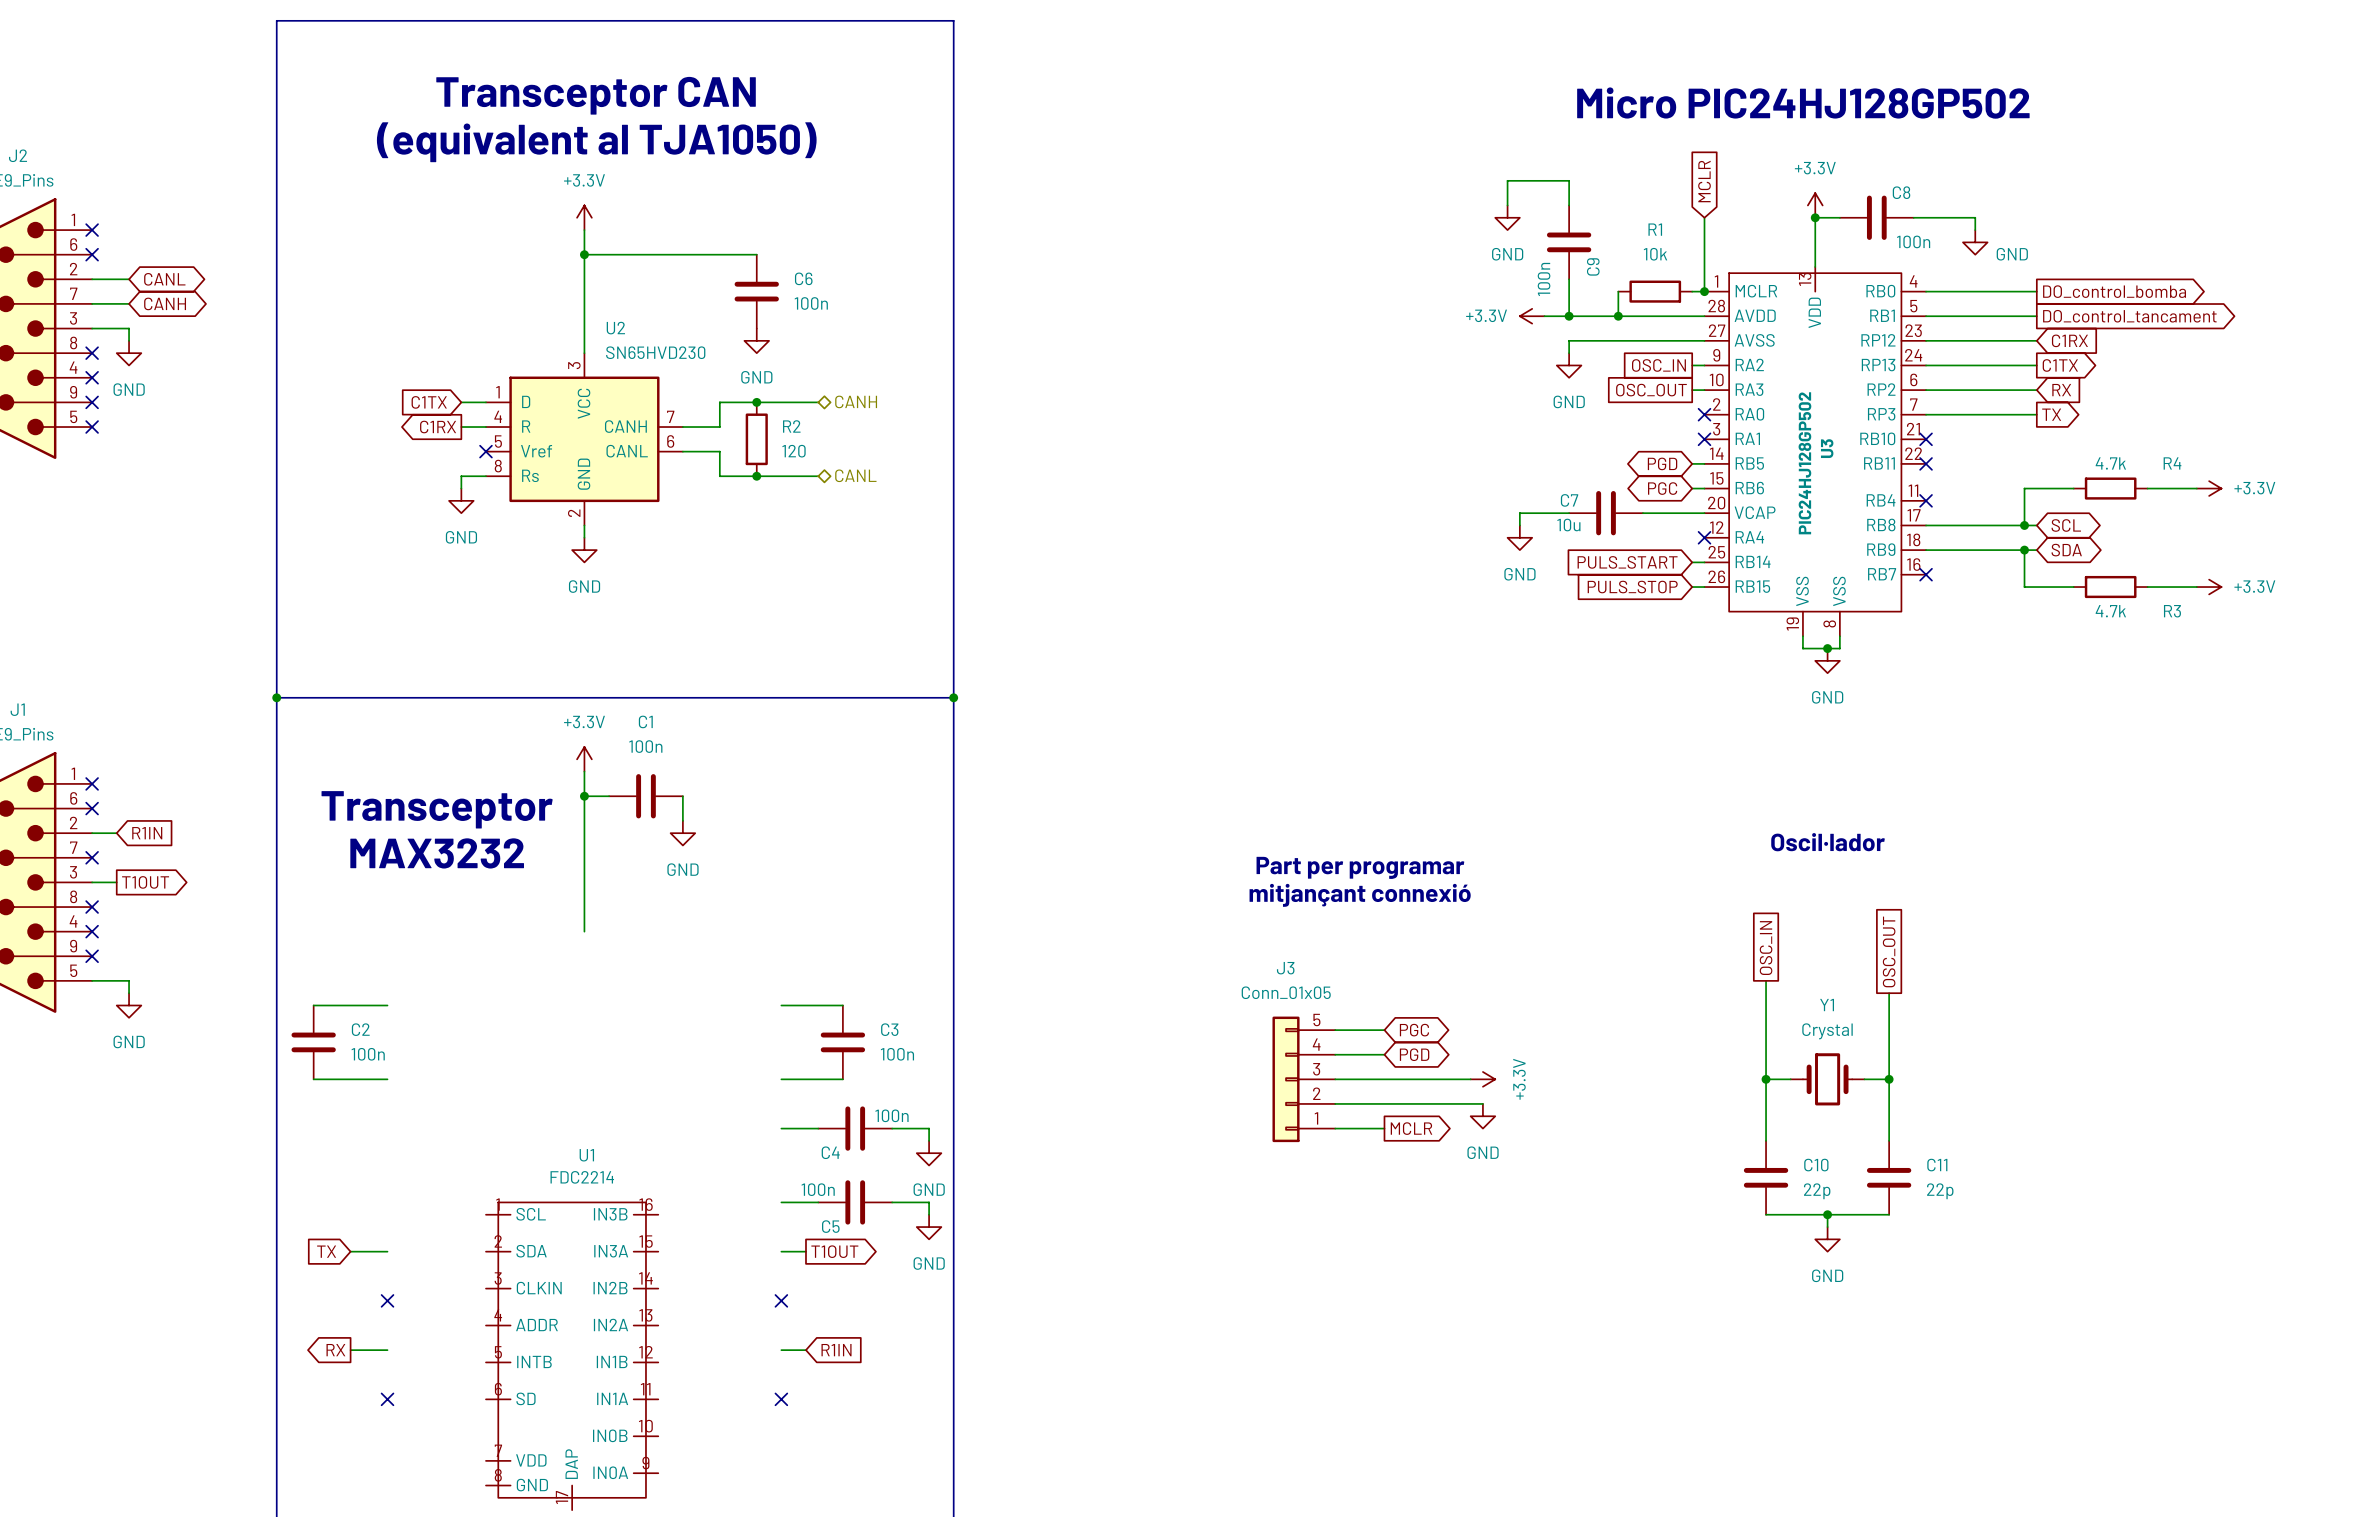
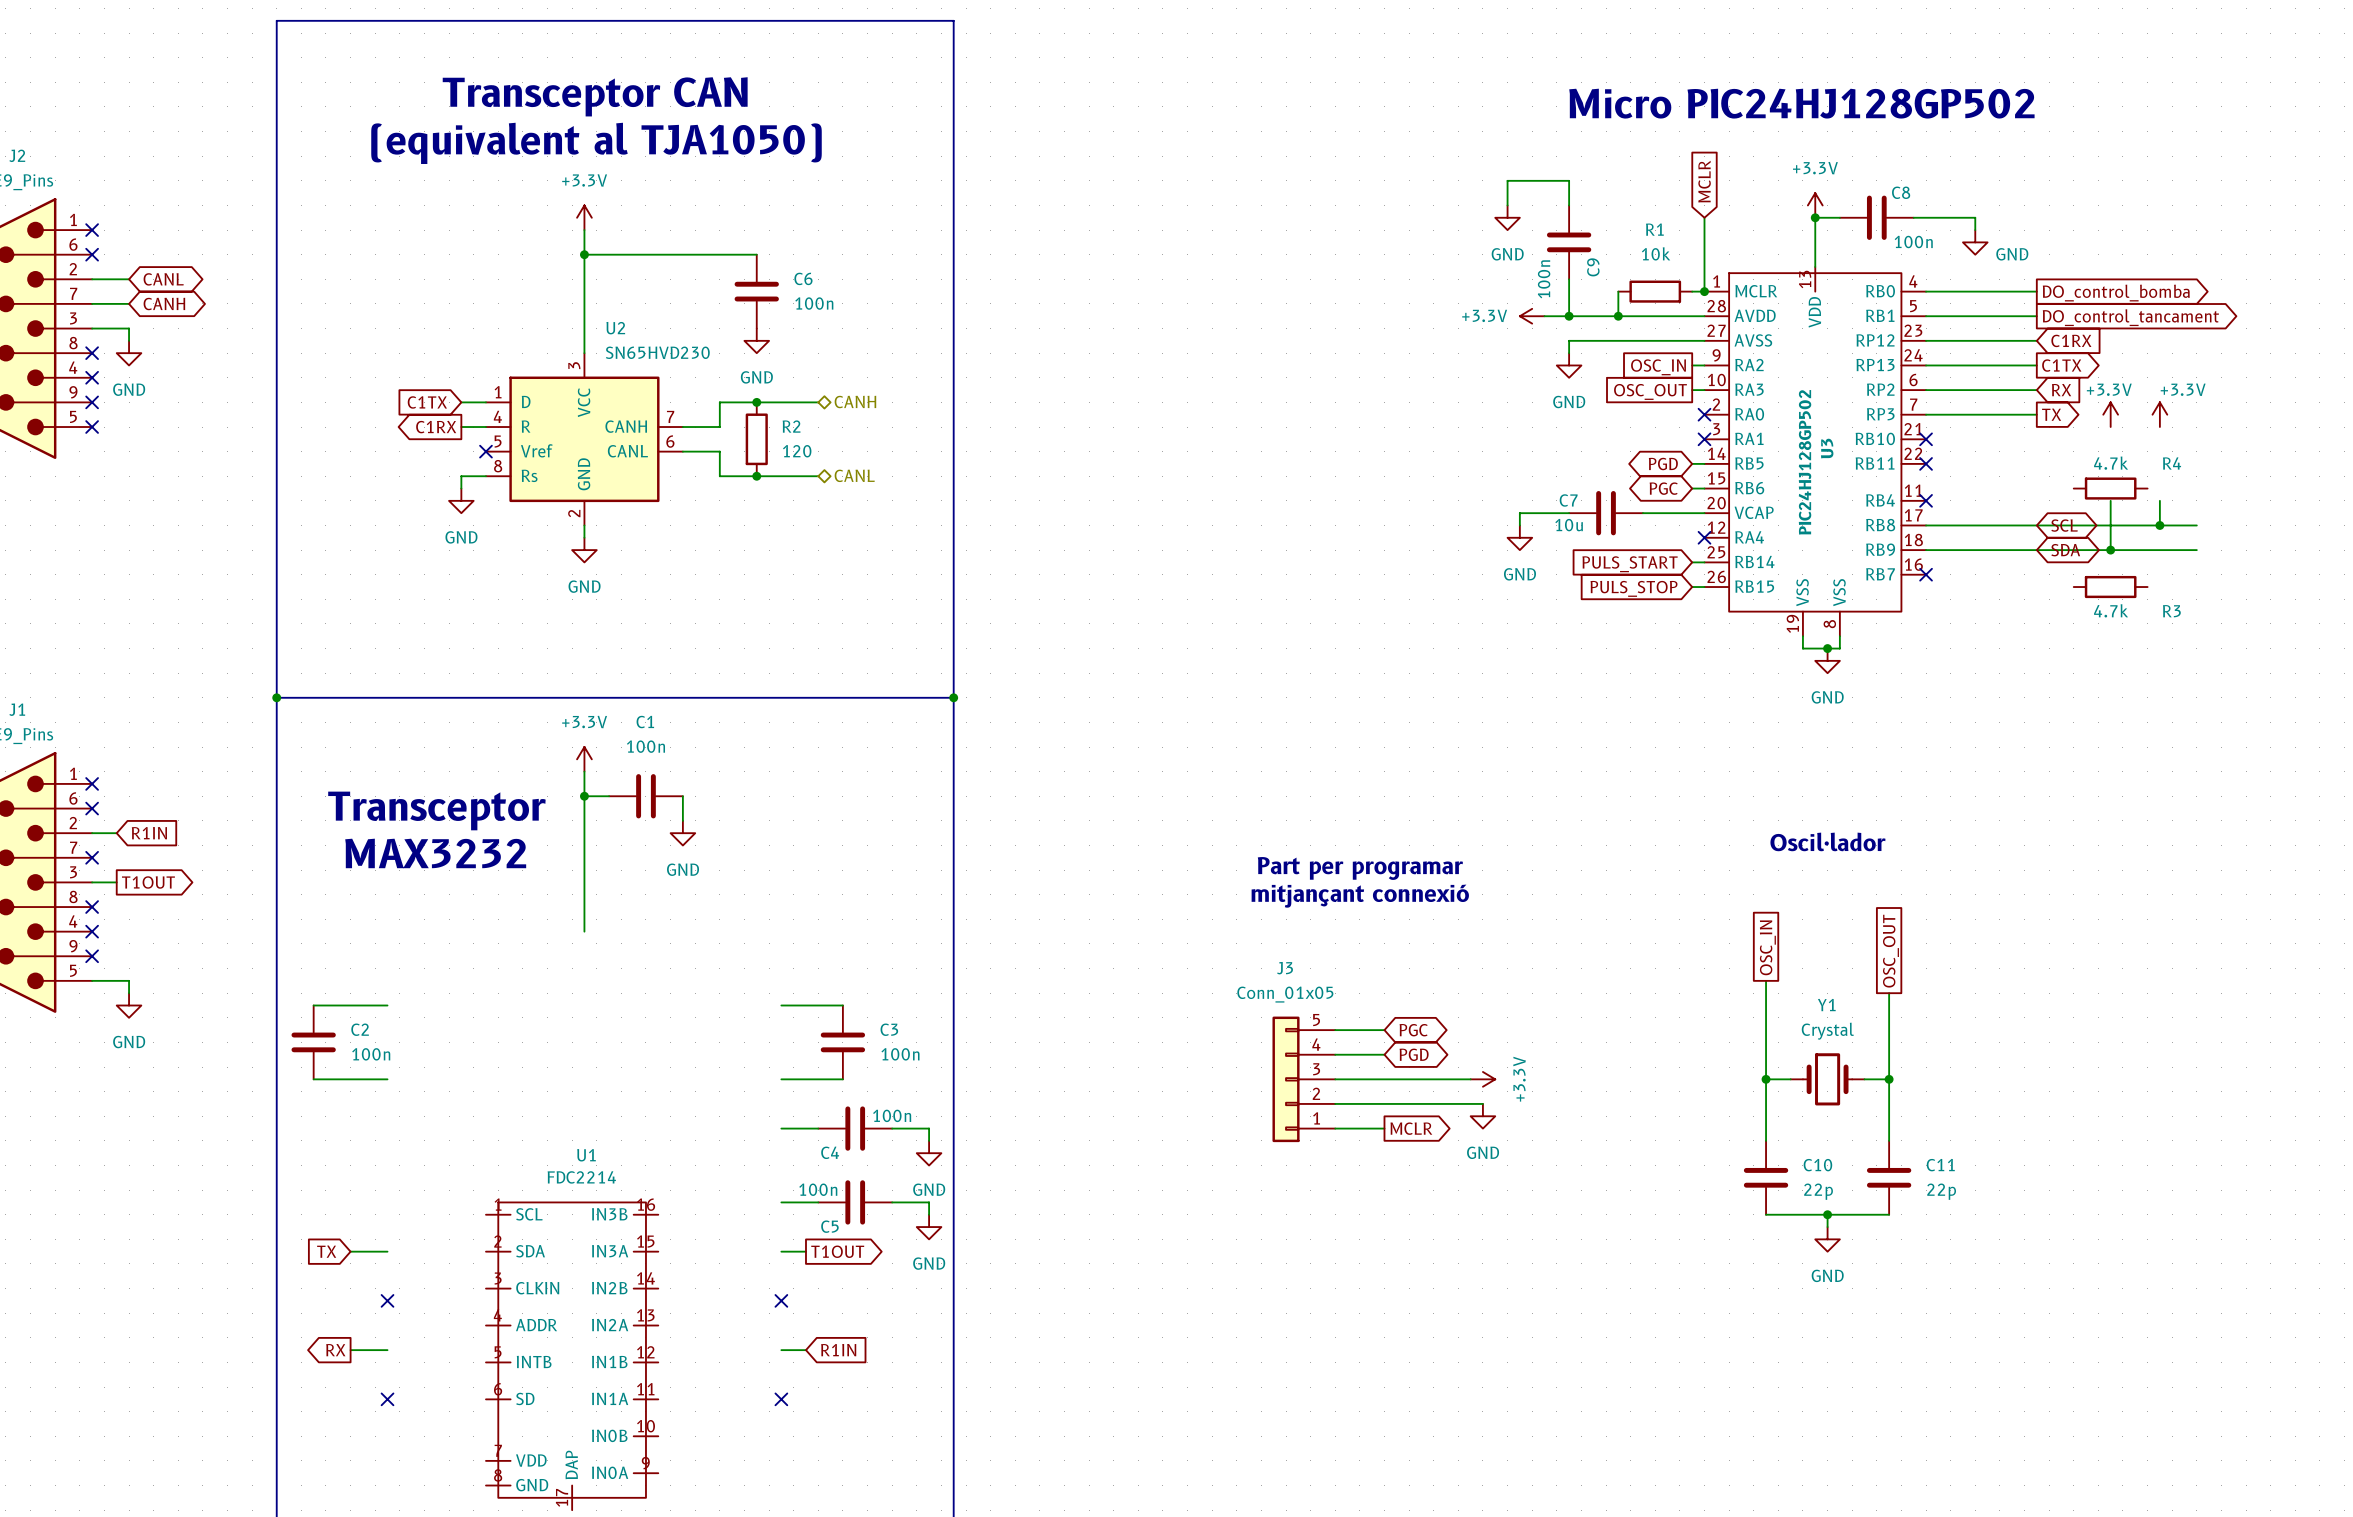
power symbol: none -> +3.3V (2110, 414)
power symbol: none -> +3.3V (2159, 414)
wire: (2073, 488) (2024, 488) (2024, 525) -> none
wire: (2147, 488) (2196, 488) -> none
power symbol: +3.3V (2209, 488) -> none
wire: none -> (2110, 500) (2110, 550)
wire: none -> (2159, 500) (2159, 525)
junction: (2024, 525) -> none
wire: none -> (2036, 525) (2196, 525)
junction: none -> (2159, 525)
wire: (2024, 550) (2024, 587) (2073, 587) -> none
junction: (2024, 550) -> none
wire: none -> (2036, 550) (2196, 550)
junction: none -> (2110, 550)
wire: (2147, 587) (2196, 587) -> none
power symbol: +3.3V (2209, 587) -> none

